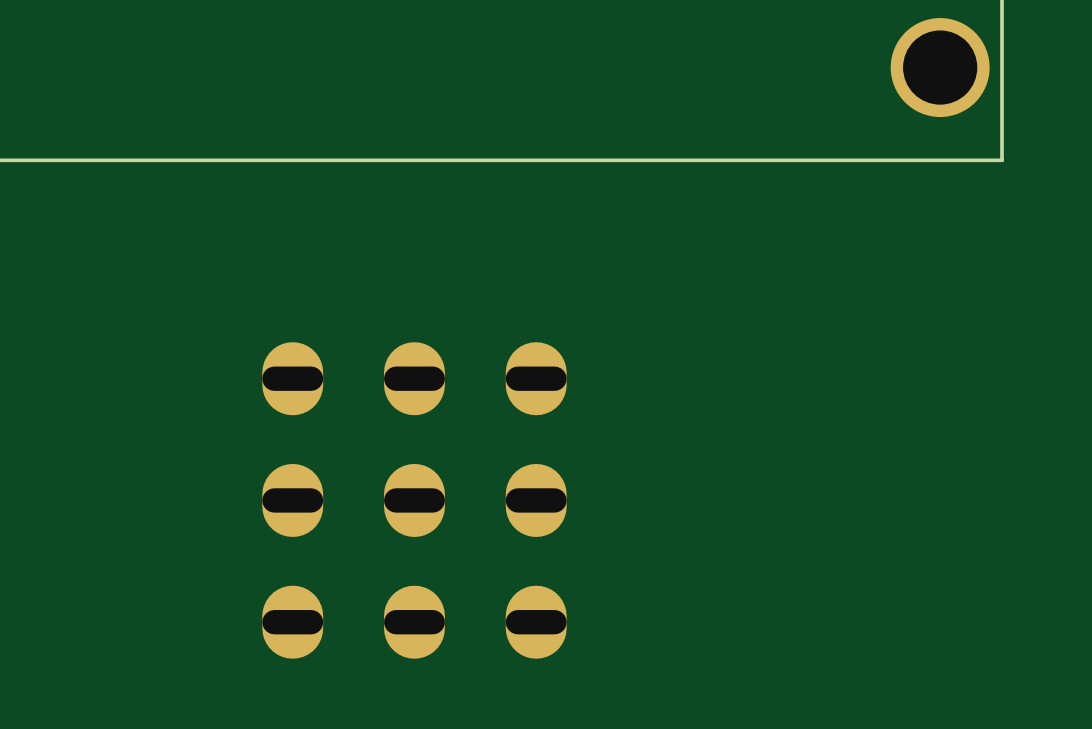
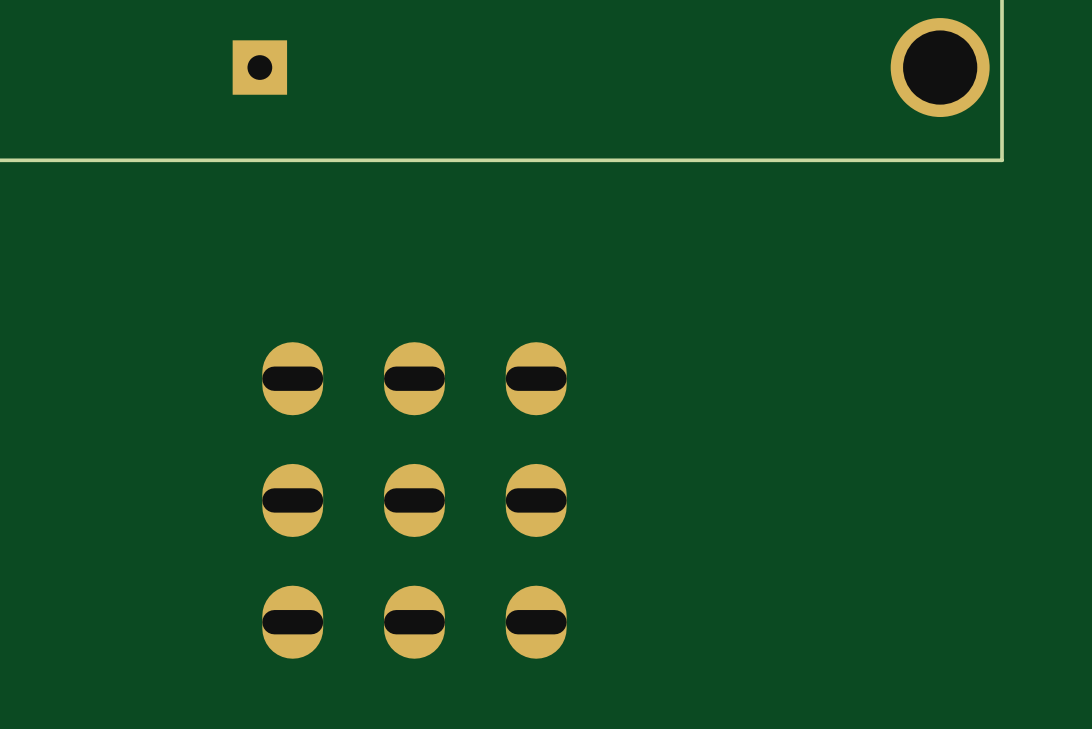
part: none -> (259, 67)

